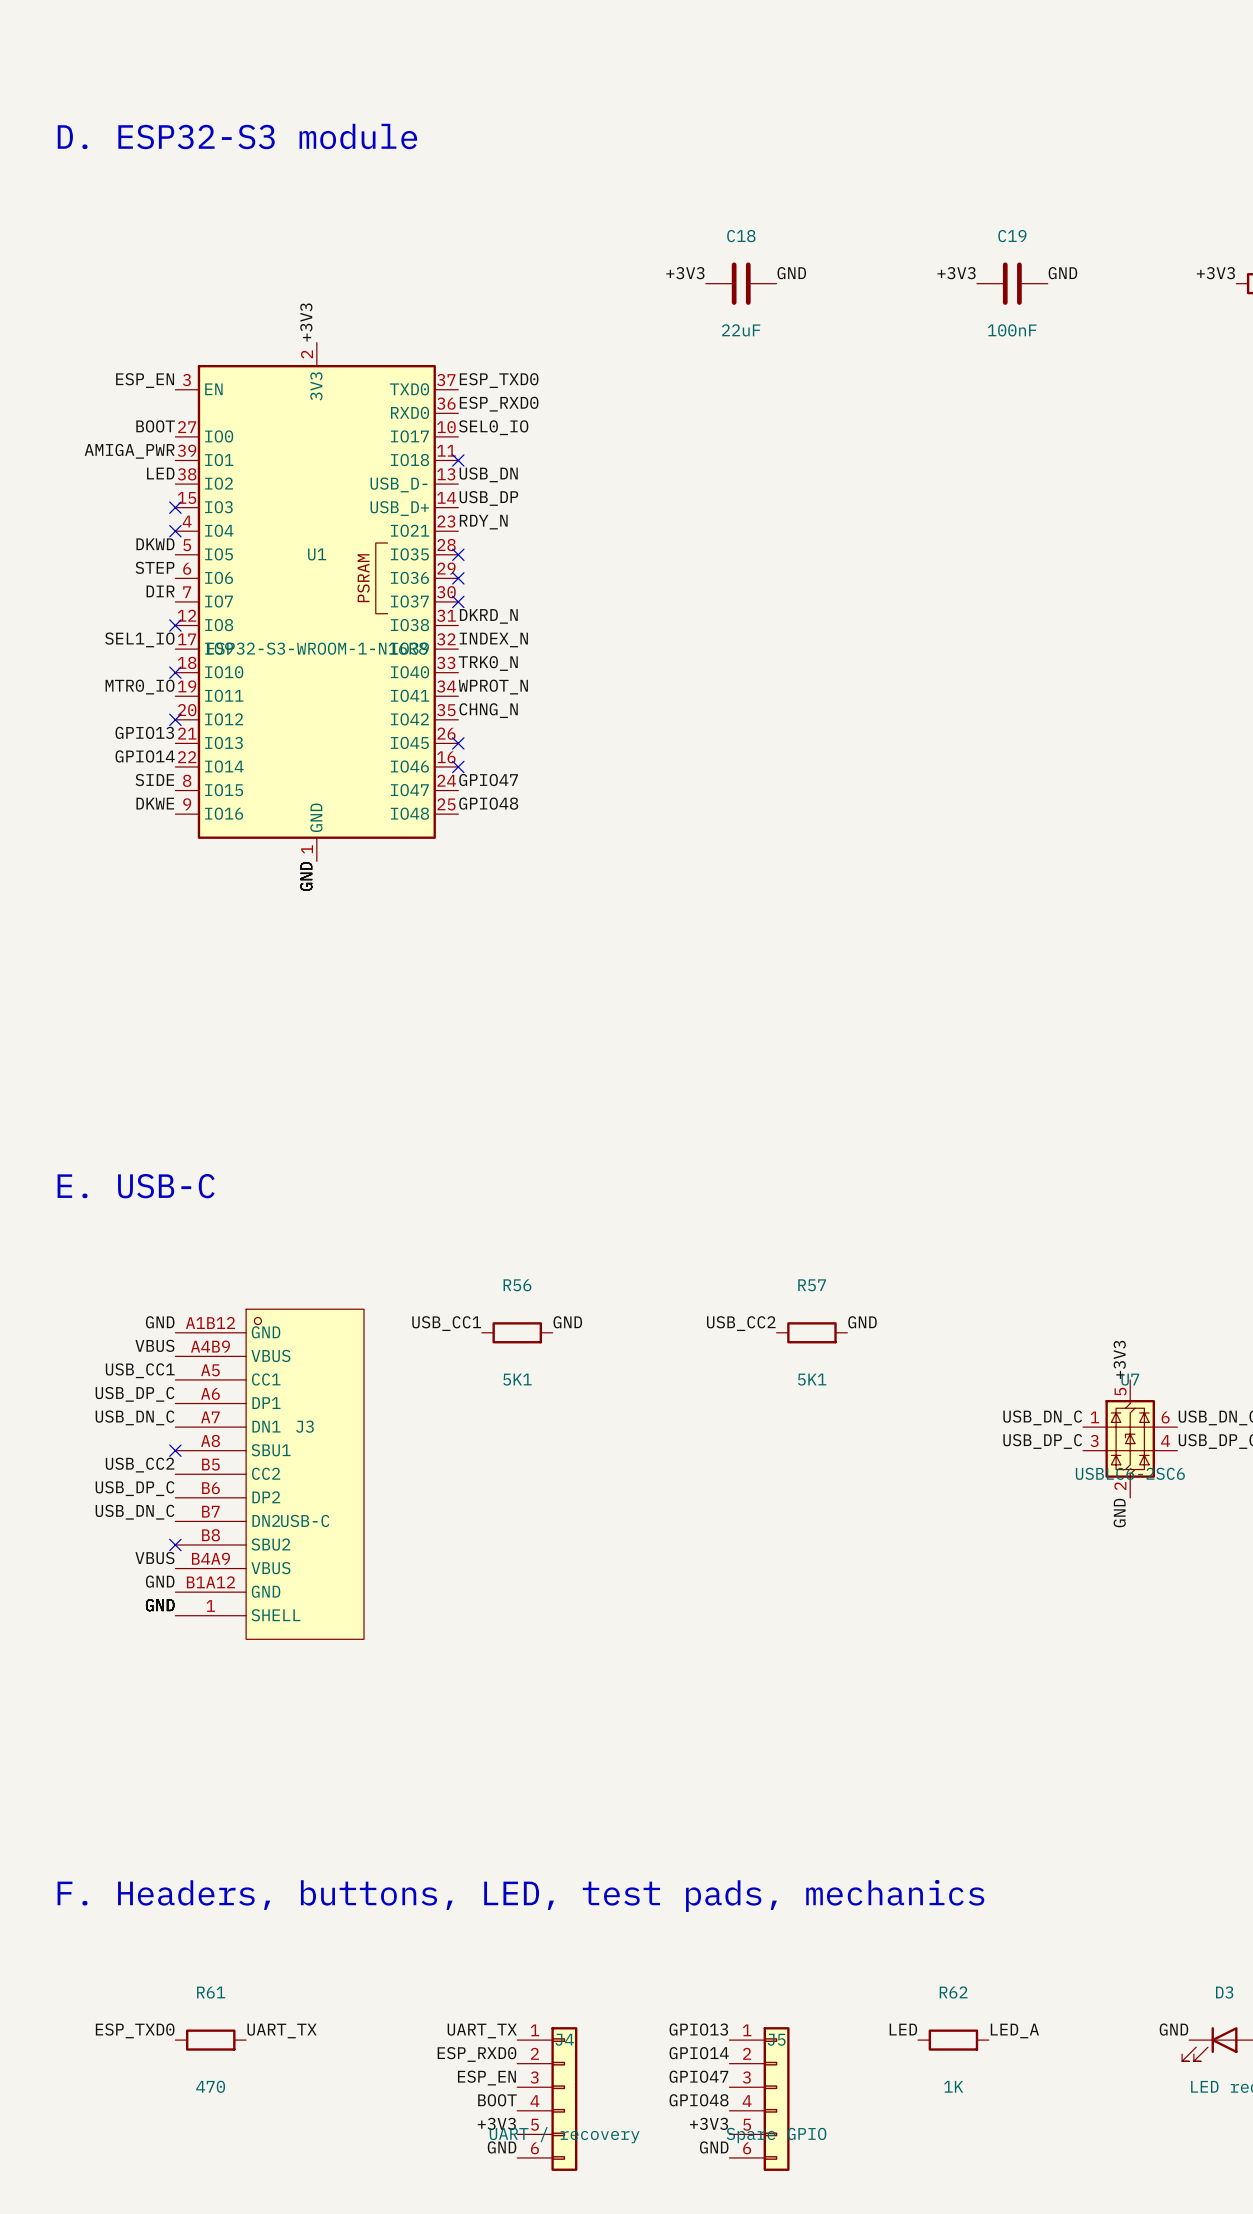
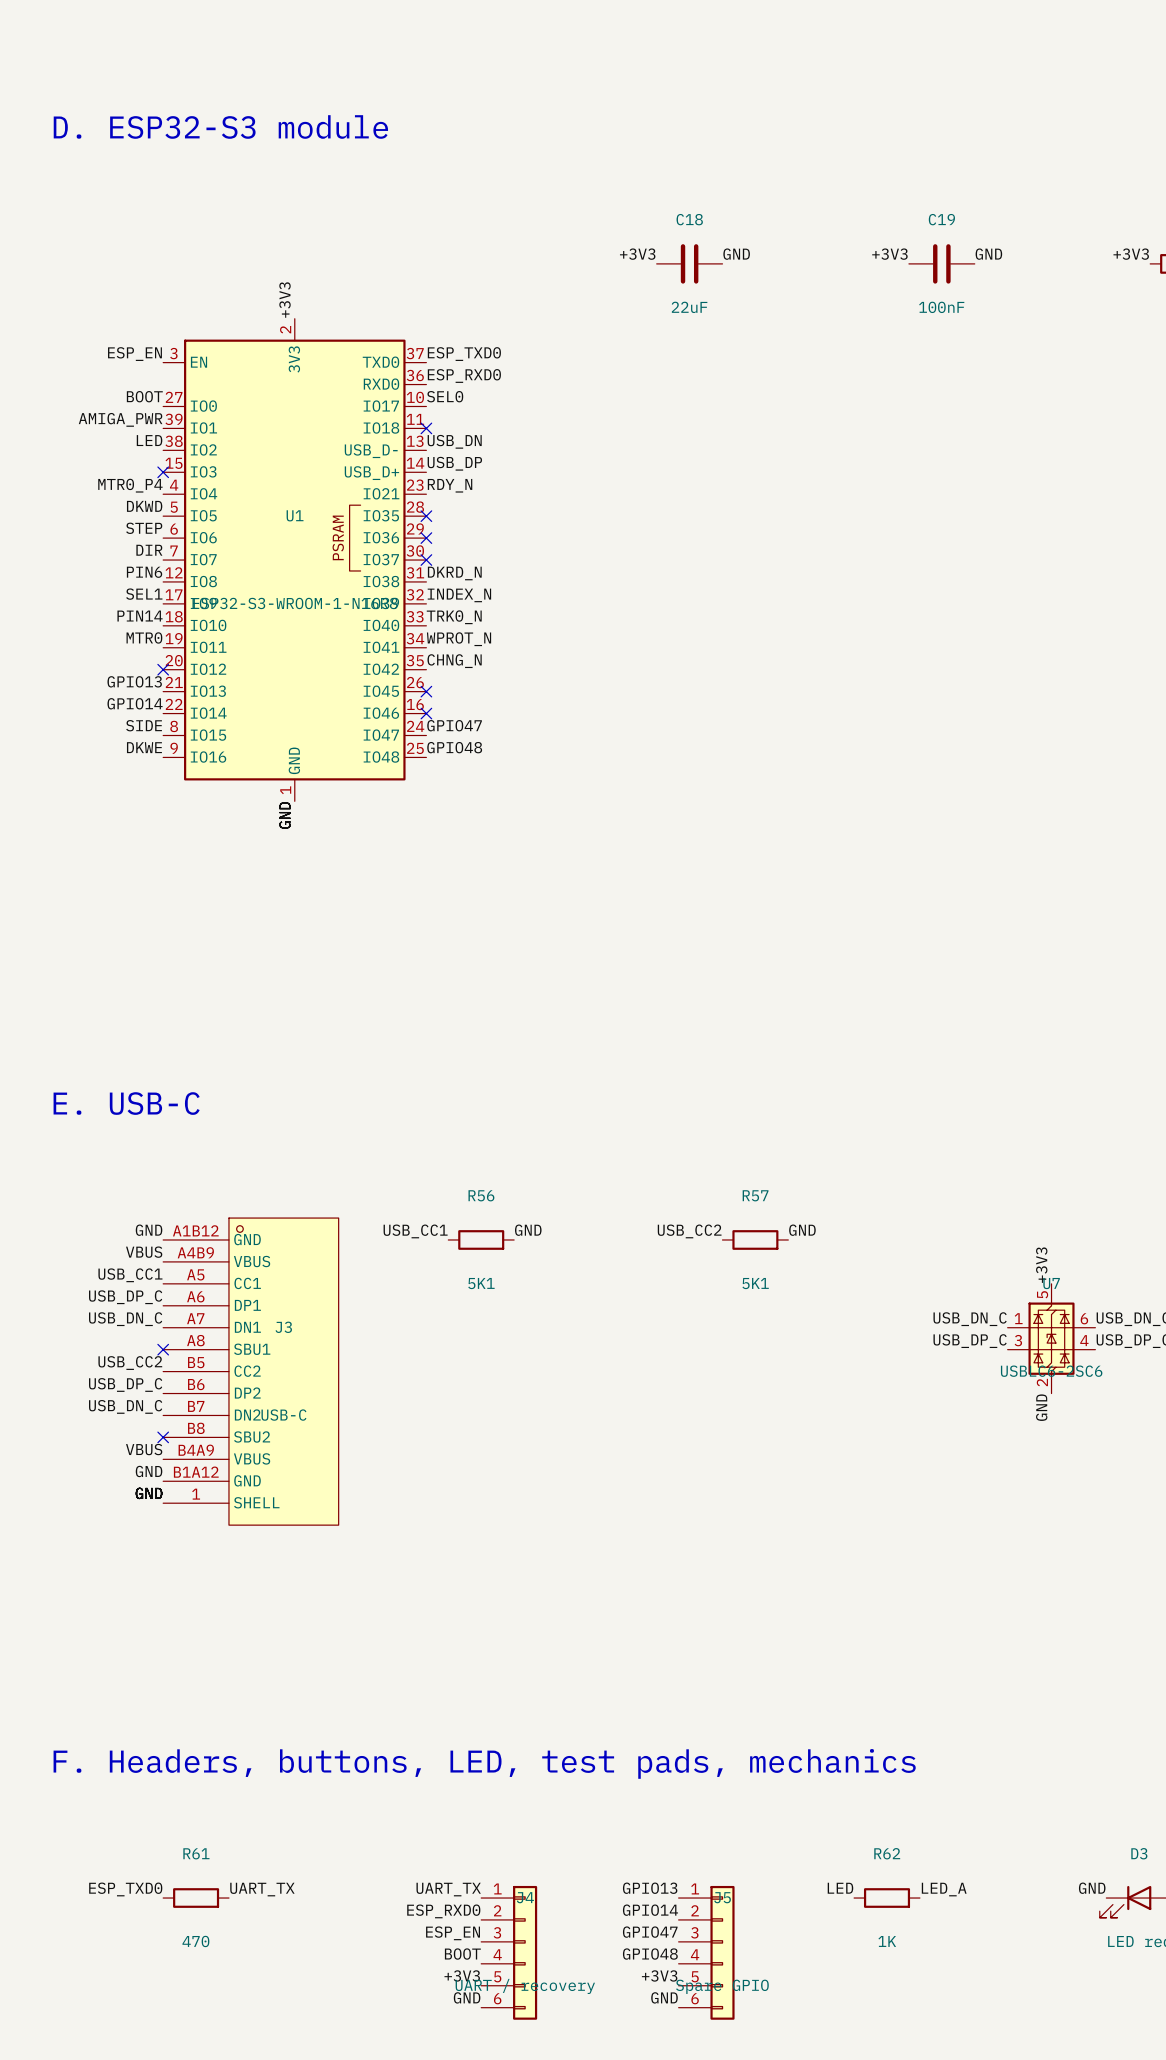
label: SEL0_IO (493, 427) -> SEL0 (445, 396)
label: none -> MTR0_P4 (130, 485)
no-connect mark: (175, 531) -> none
label: none -> PIN6 (144, 572)
no-connect mark: (175, 625) -> none
label: SEL1_IO (139, 639) -> SEL1 (144, 594)
label: none -> PIN14 (140, 616)
no-connect mark: (175, 672) -> none
label: MTR0_IO (140, 687) -> MTR0 (144, 637)

